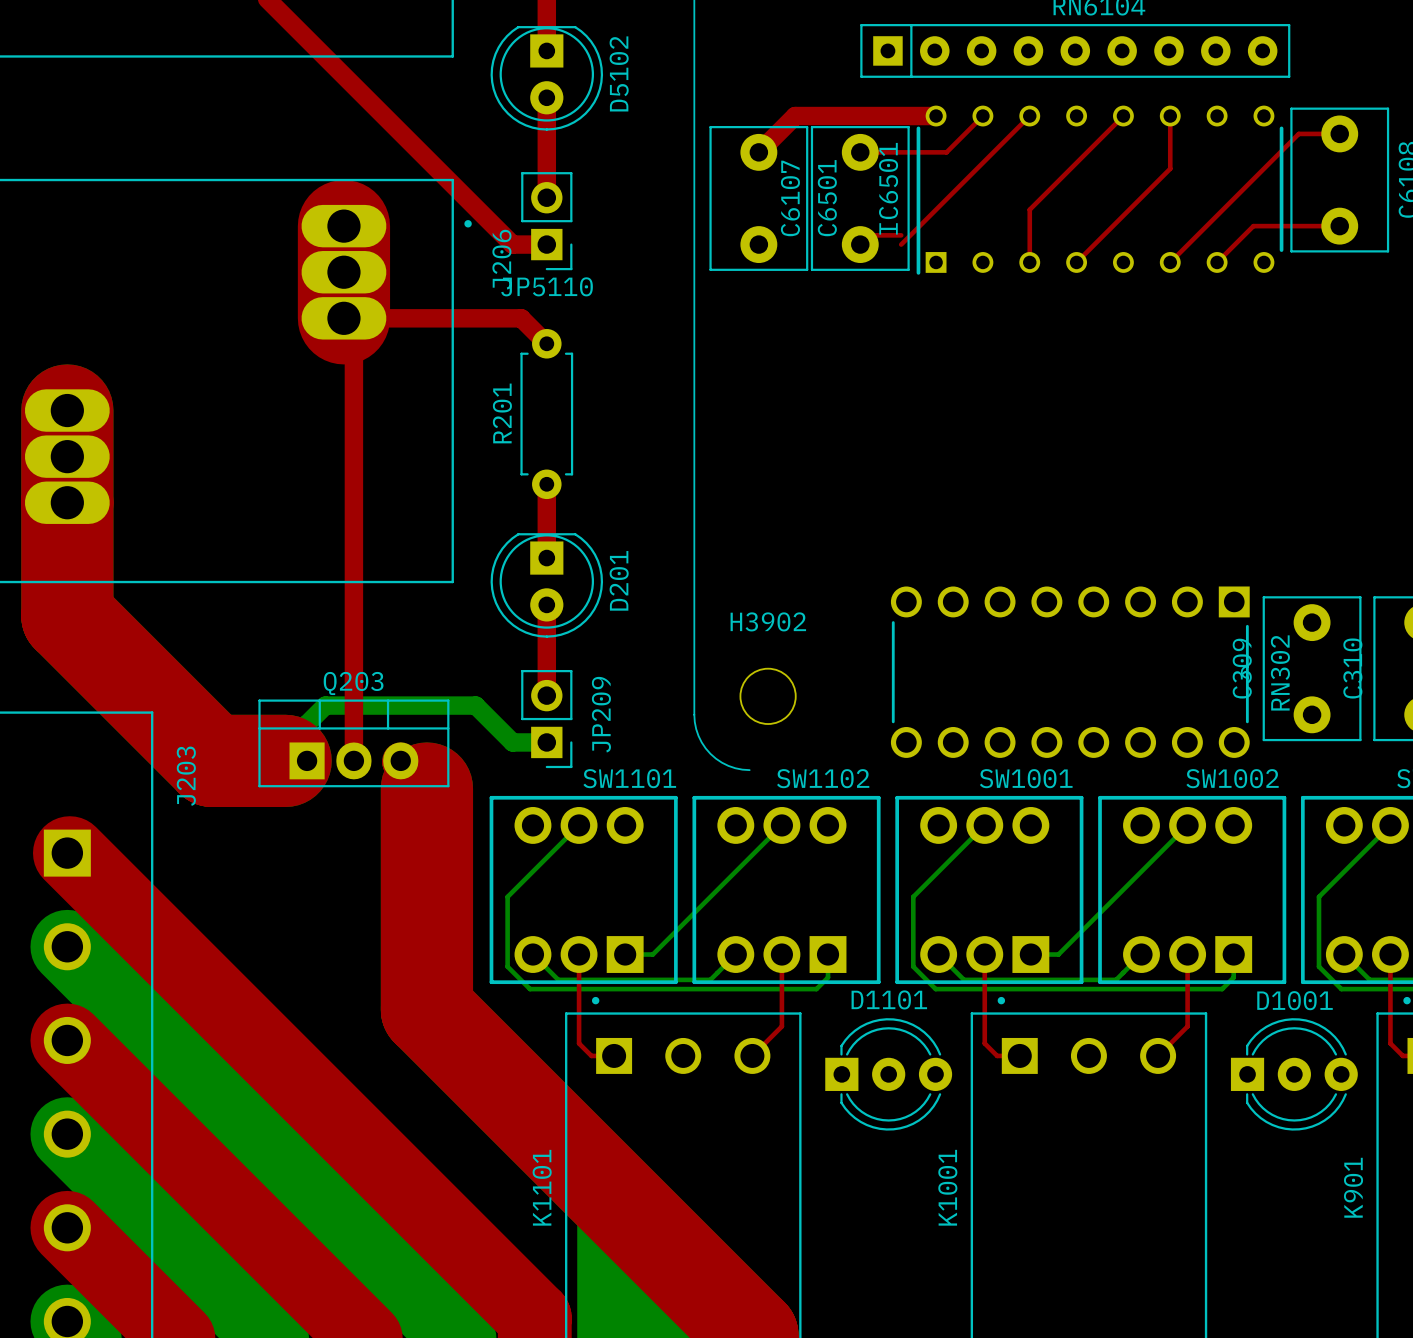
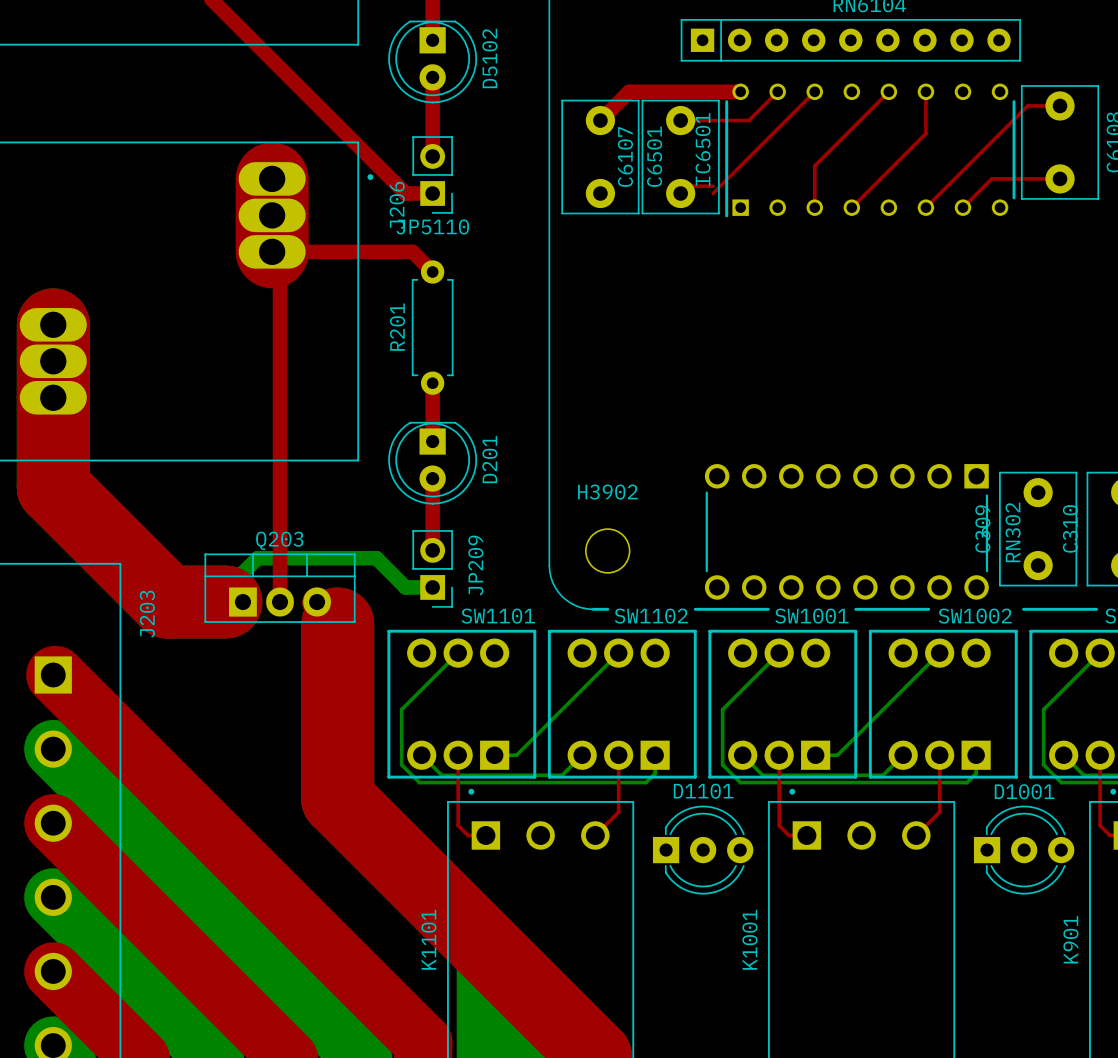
line: none -> (593, 609) (607, 609)
line: none -> (695, 609) (768, 609)
line: none -> (855, 609) (928, 609)
line: none -> (1023, 609) (1096, 609)

